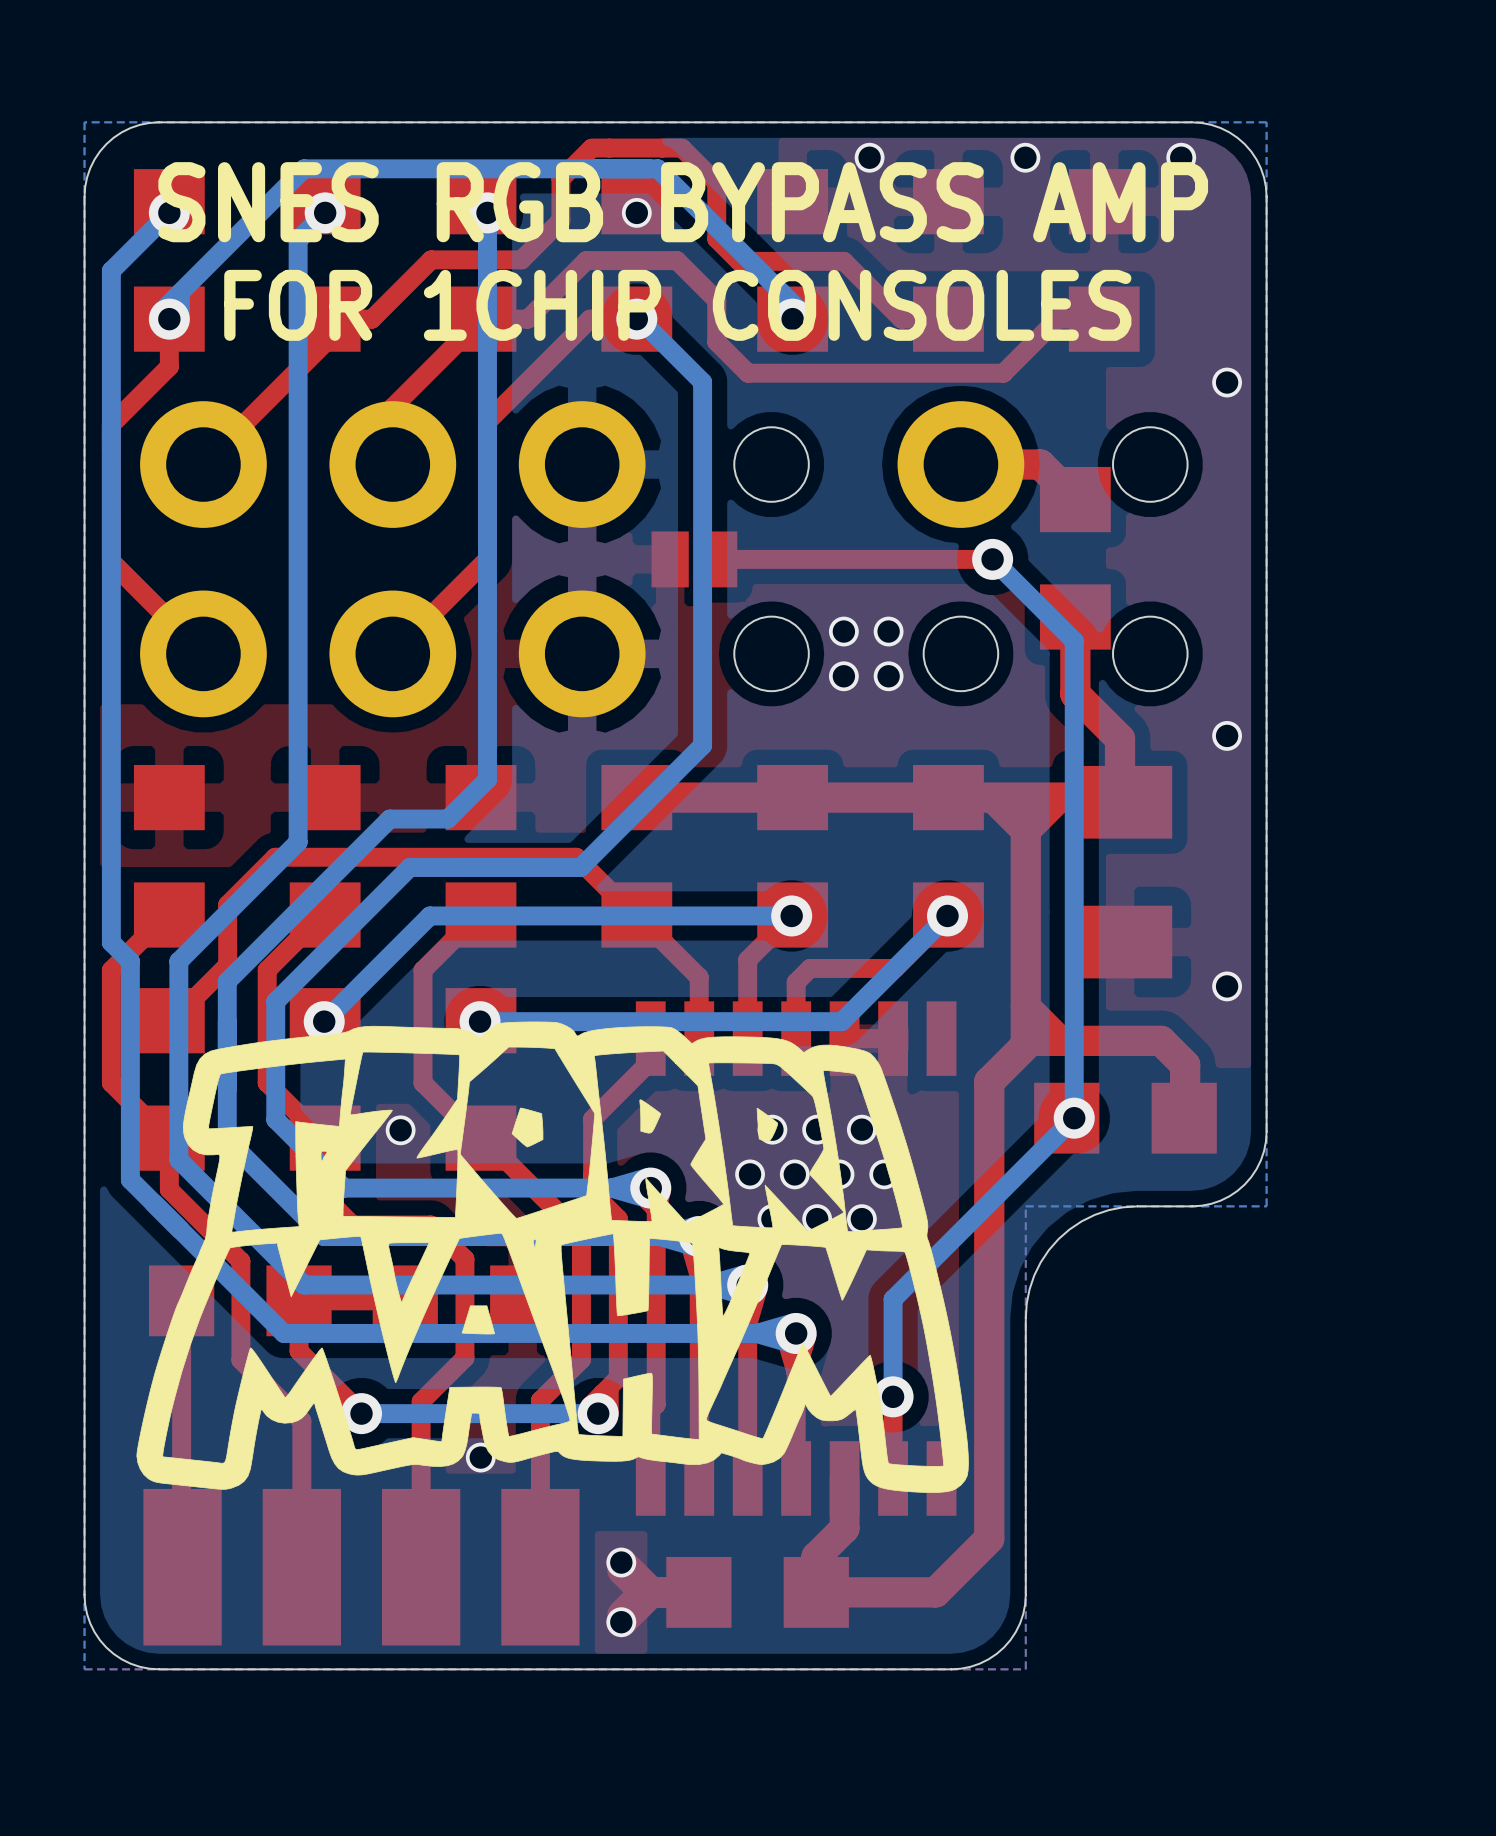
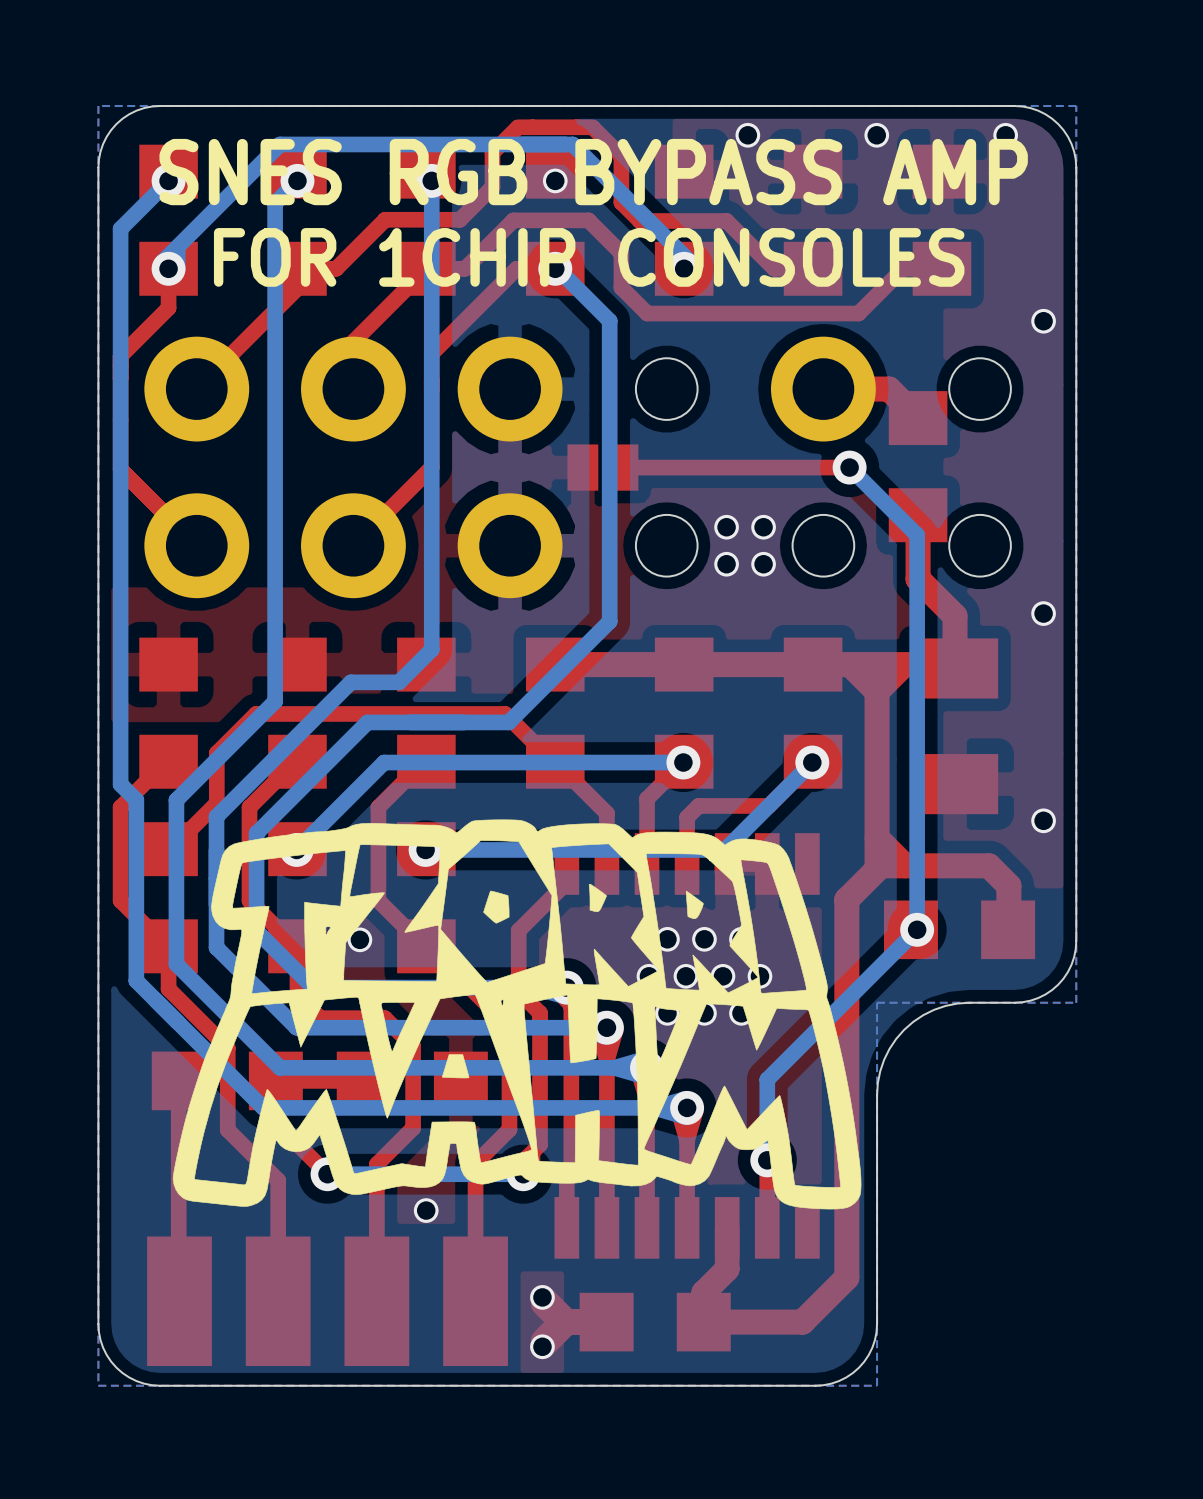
drawing position: (552, 1257) -> (517, 1014)

